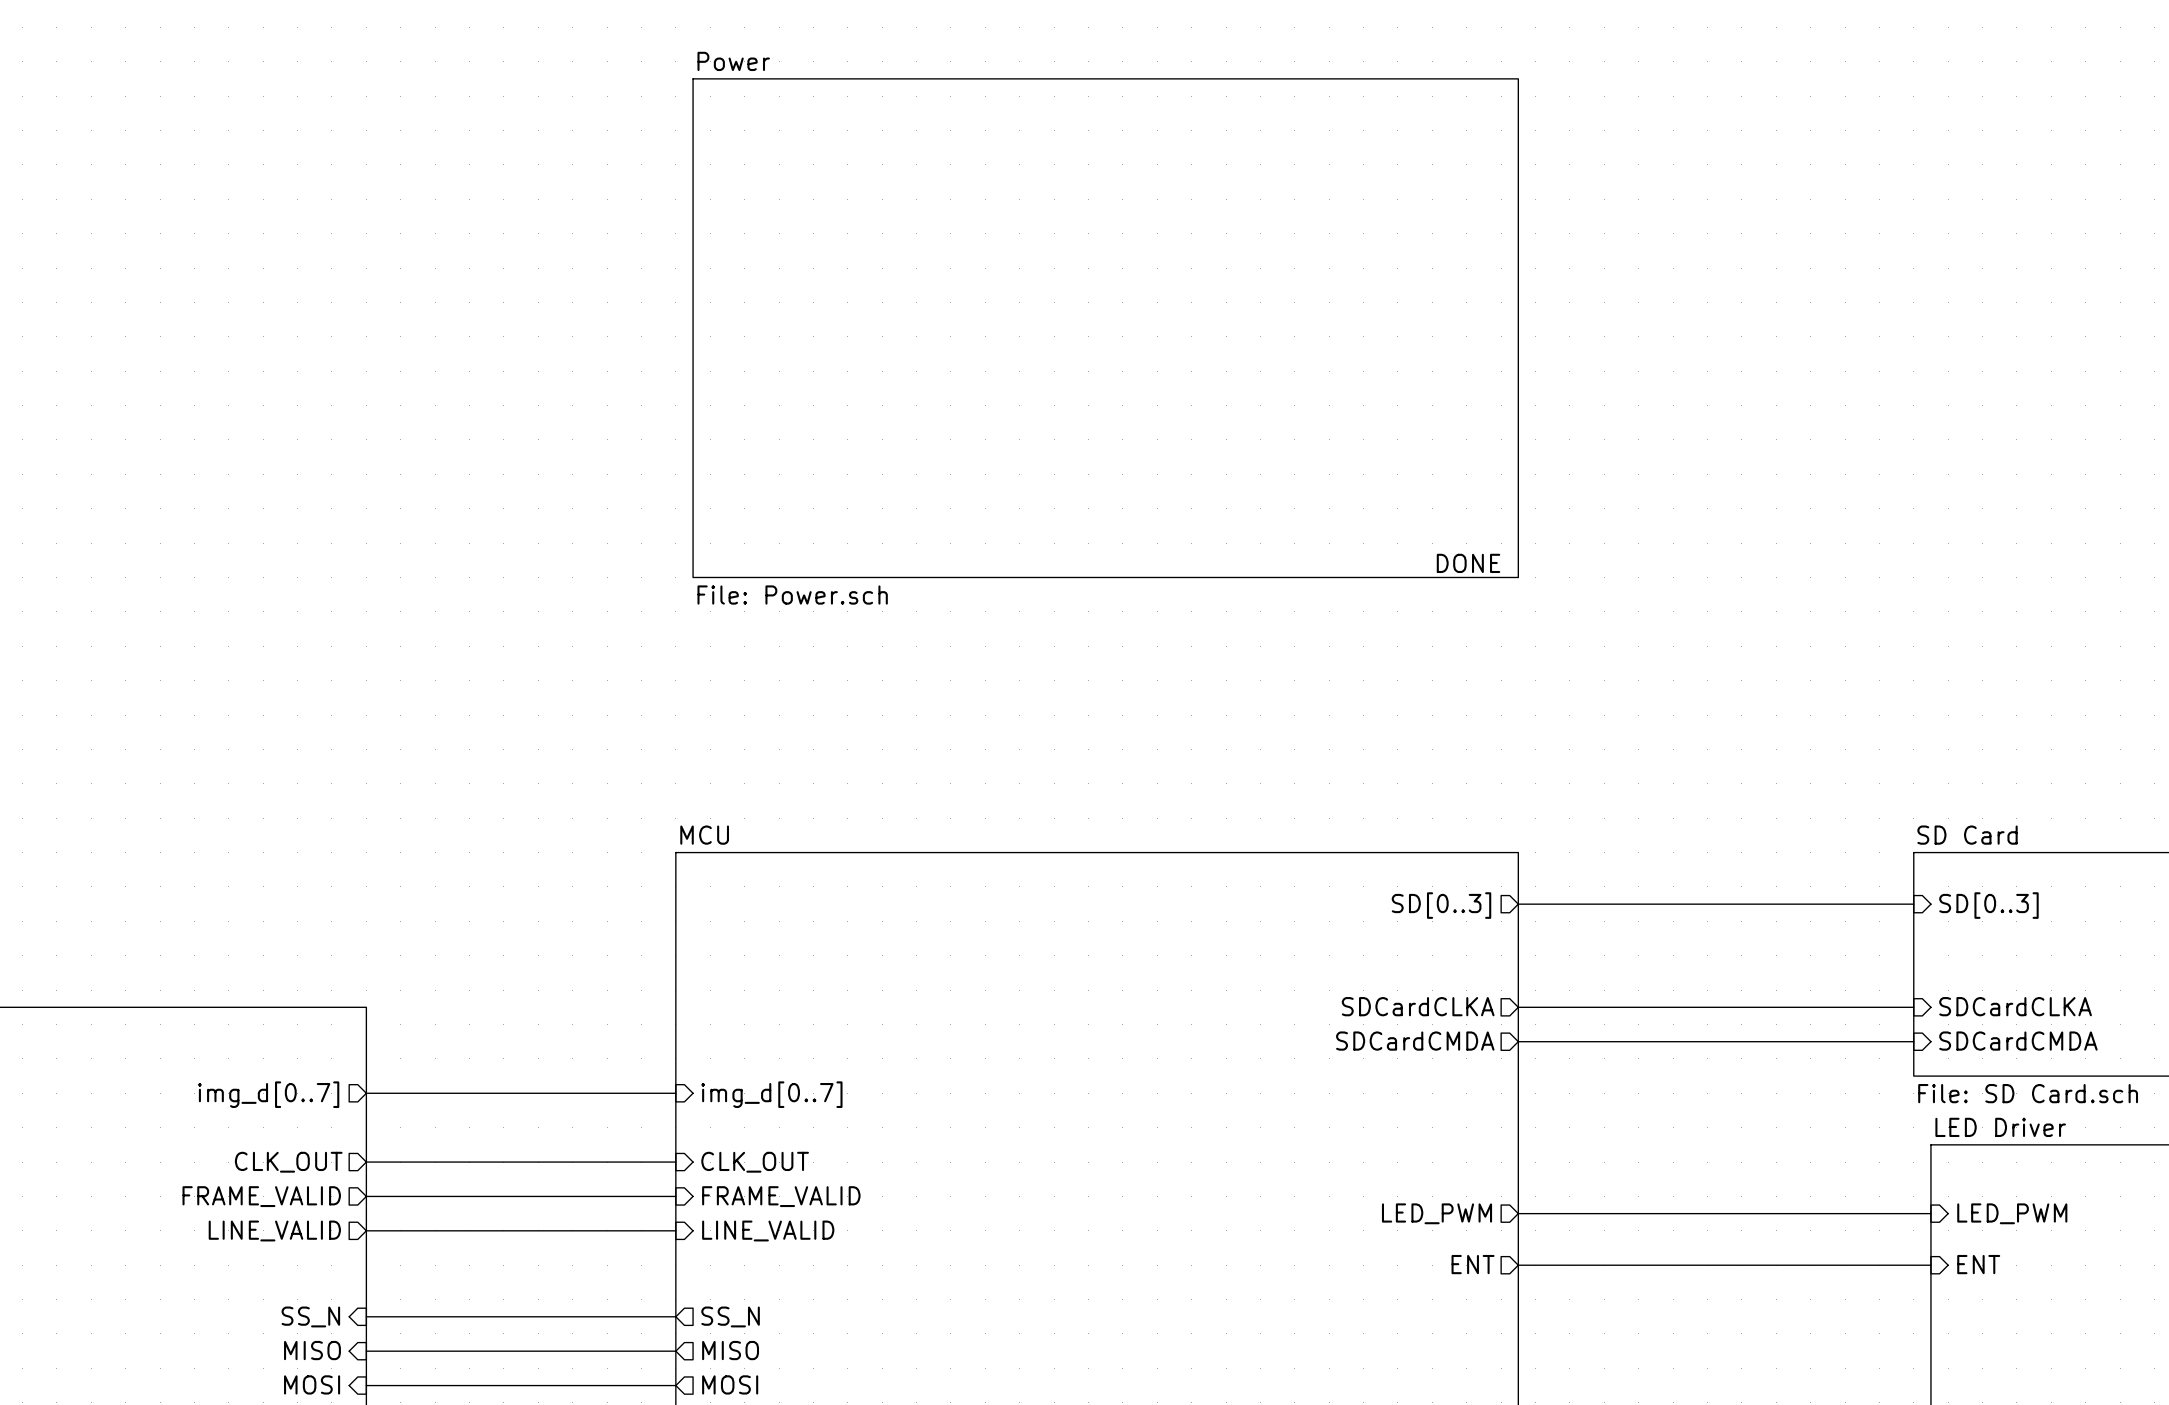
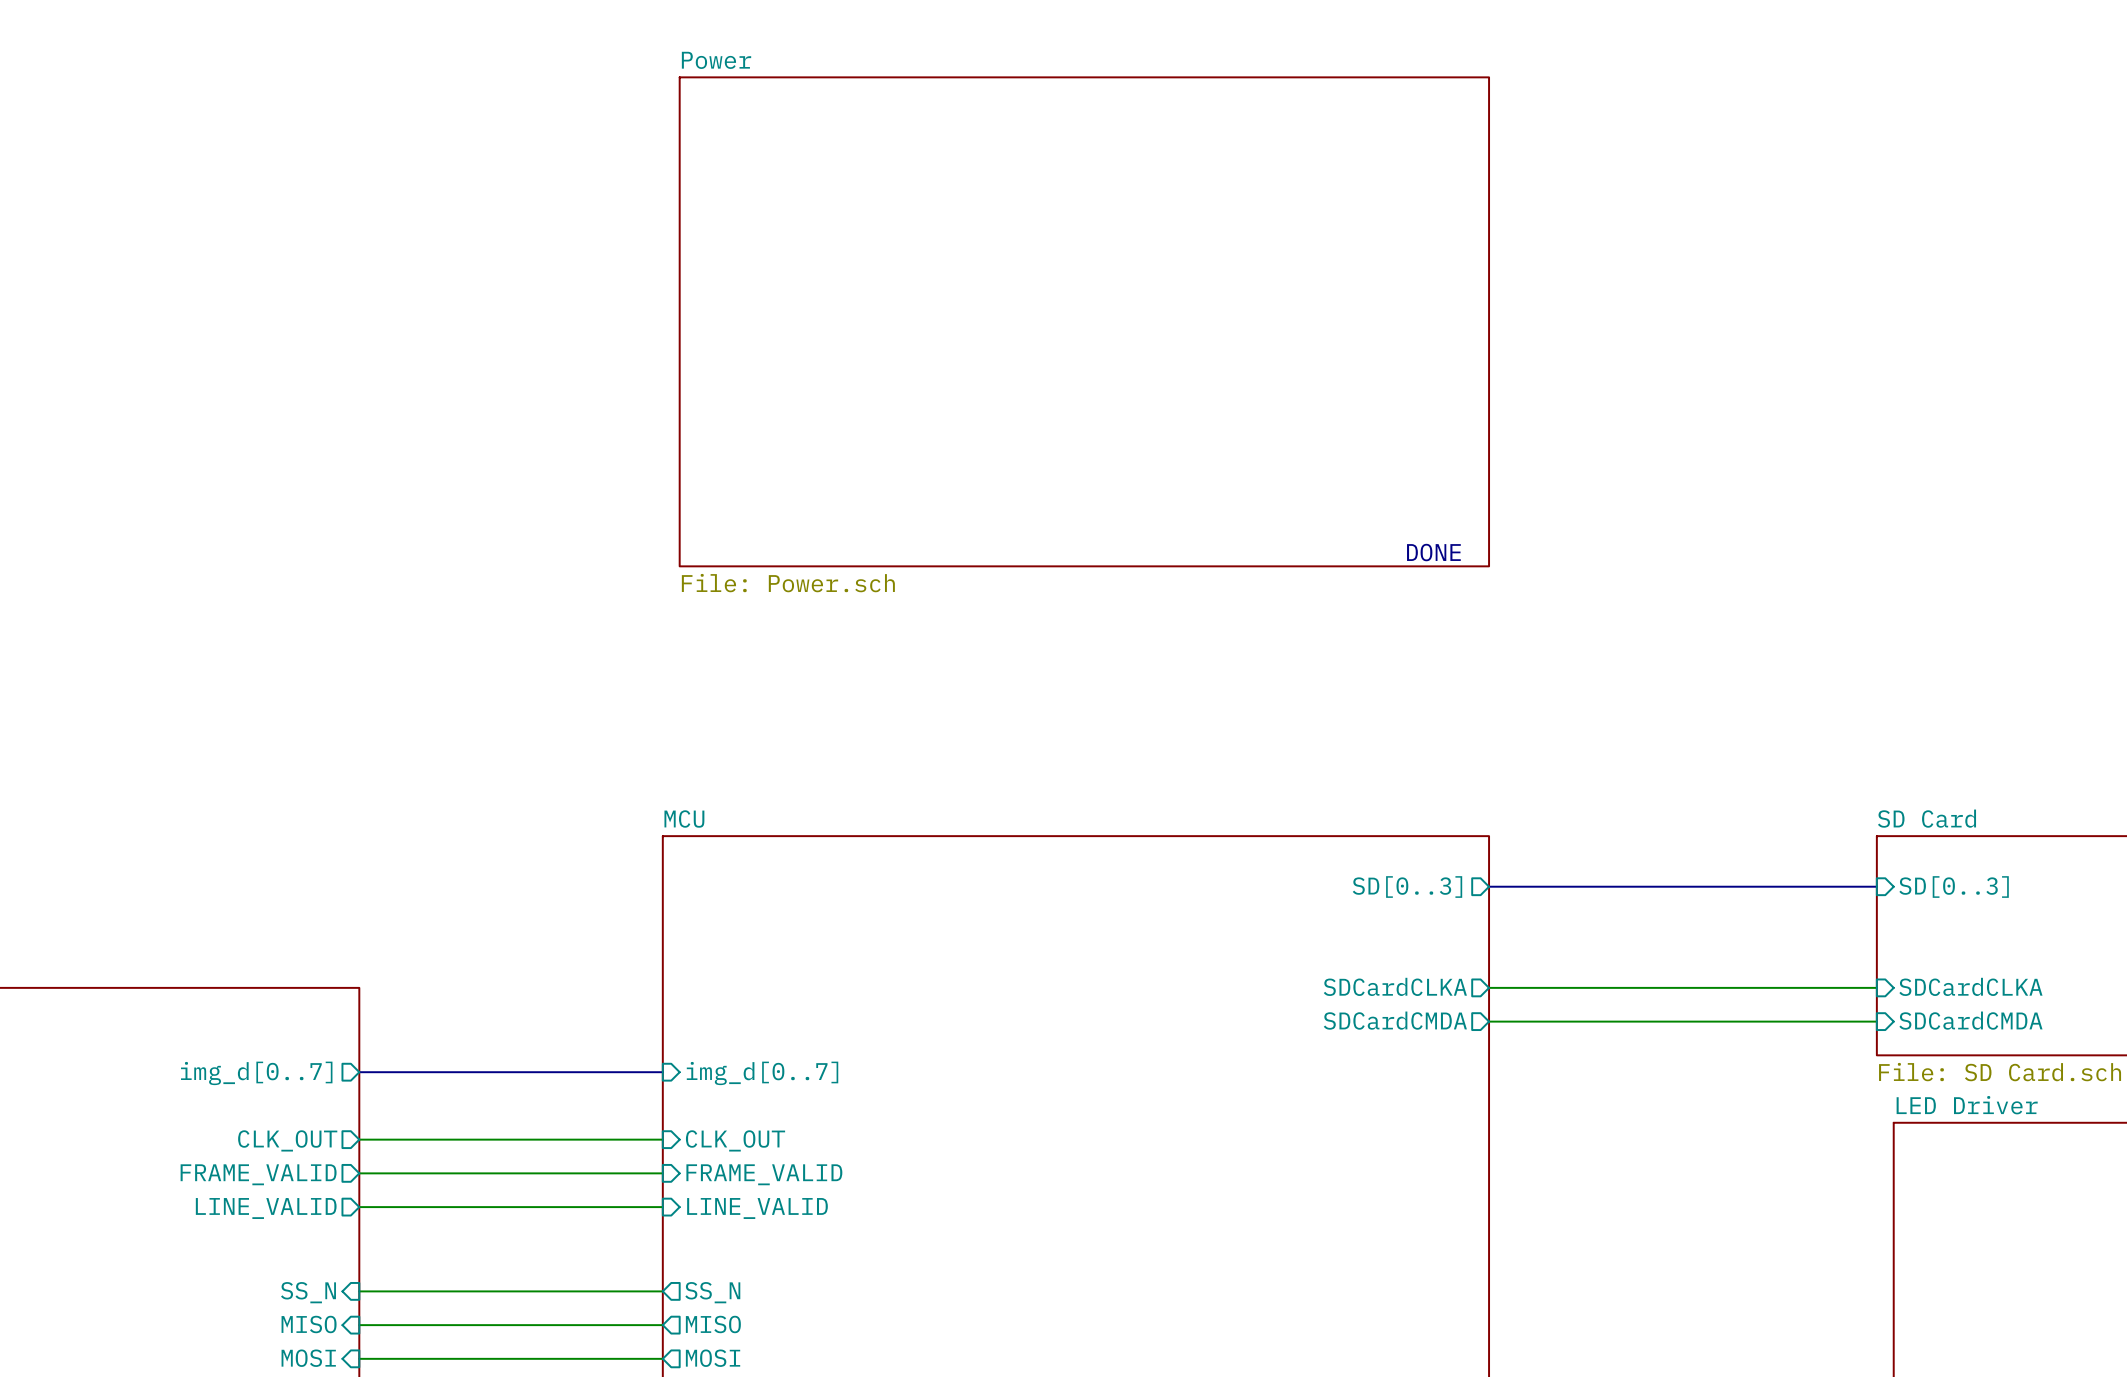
sheet pin: LED_PWM (1437, 1213) -> none
wire: (1518, 1213) (1930, 1213) -> none
sheet pin: LED_PWM (2012, 1213) -> none
sheet pin: ENT (1473, 1264) -> none
sheet pin: ENT (1978, 1264) -> none
wire: (1518, 1265) (1930, 1265) -> none

